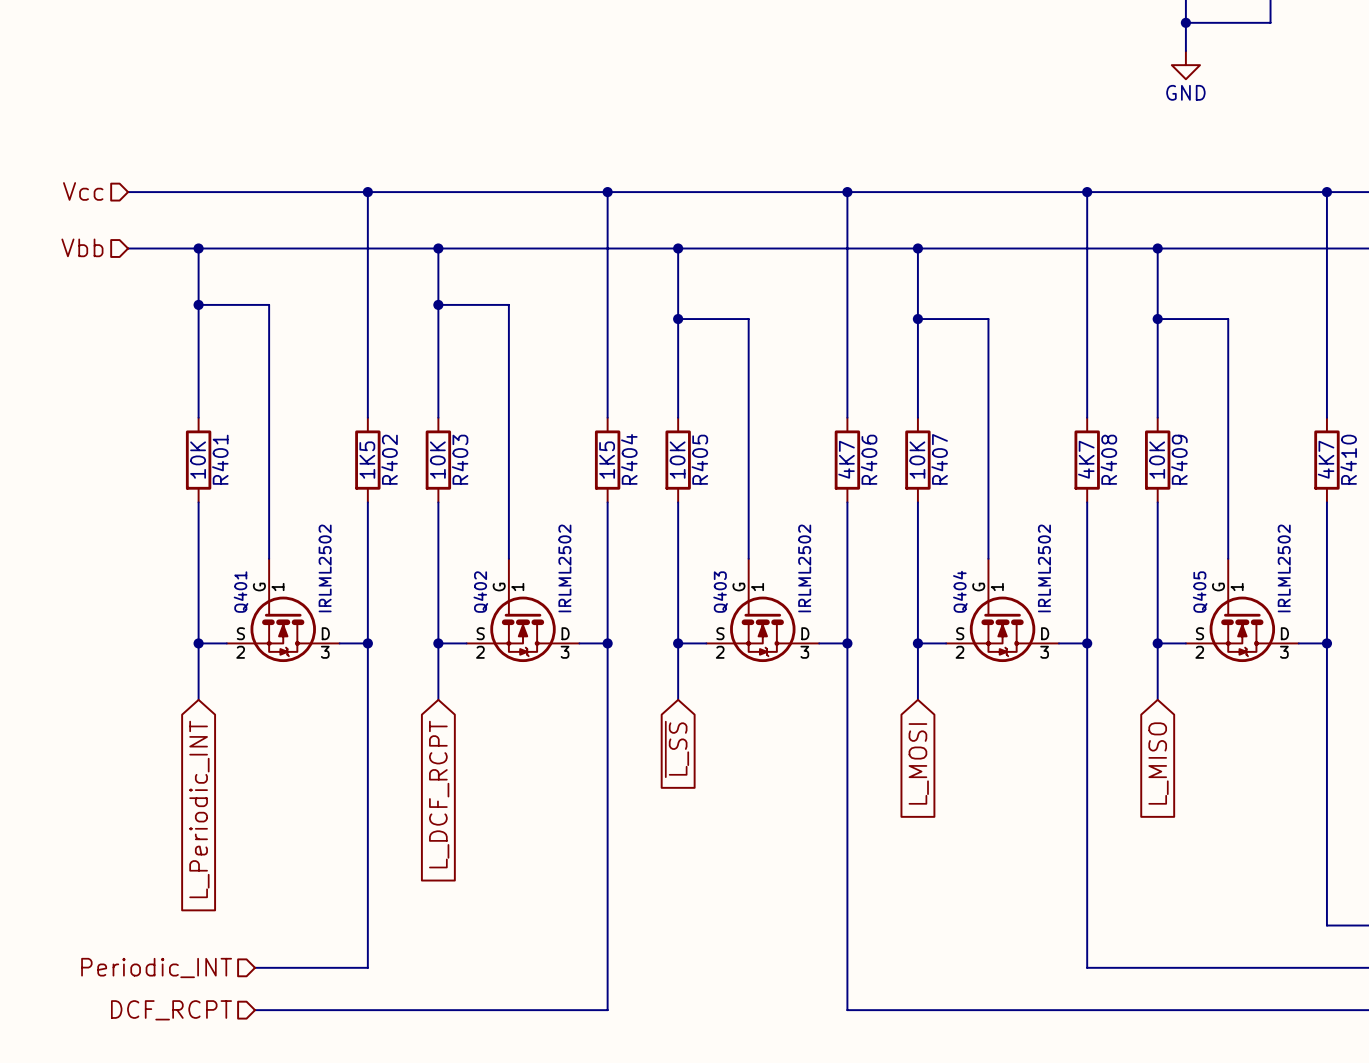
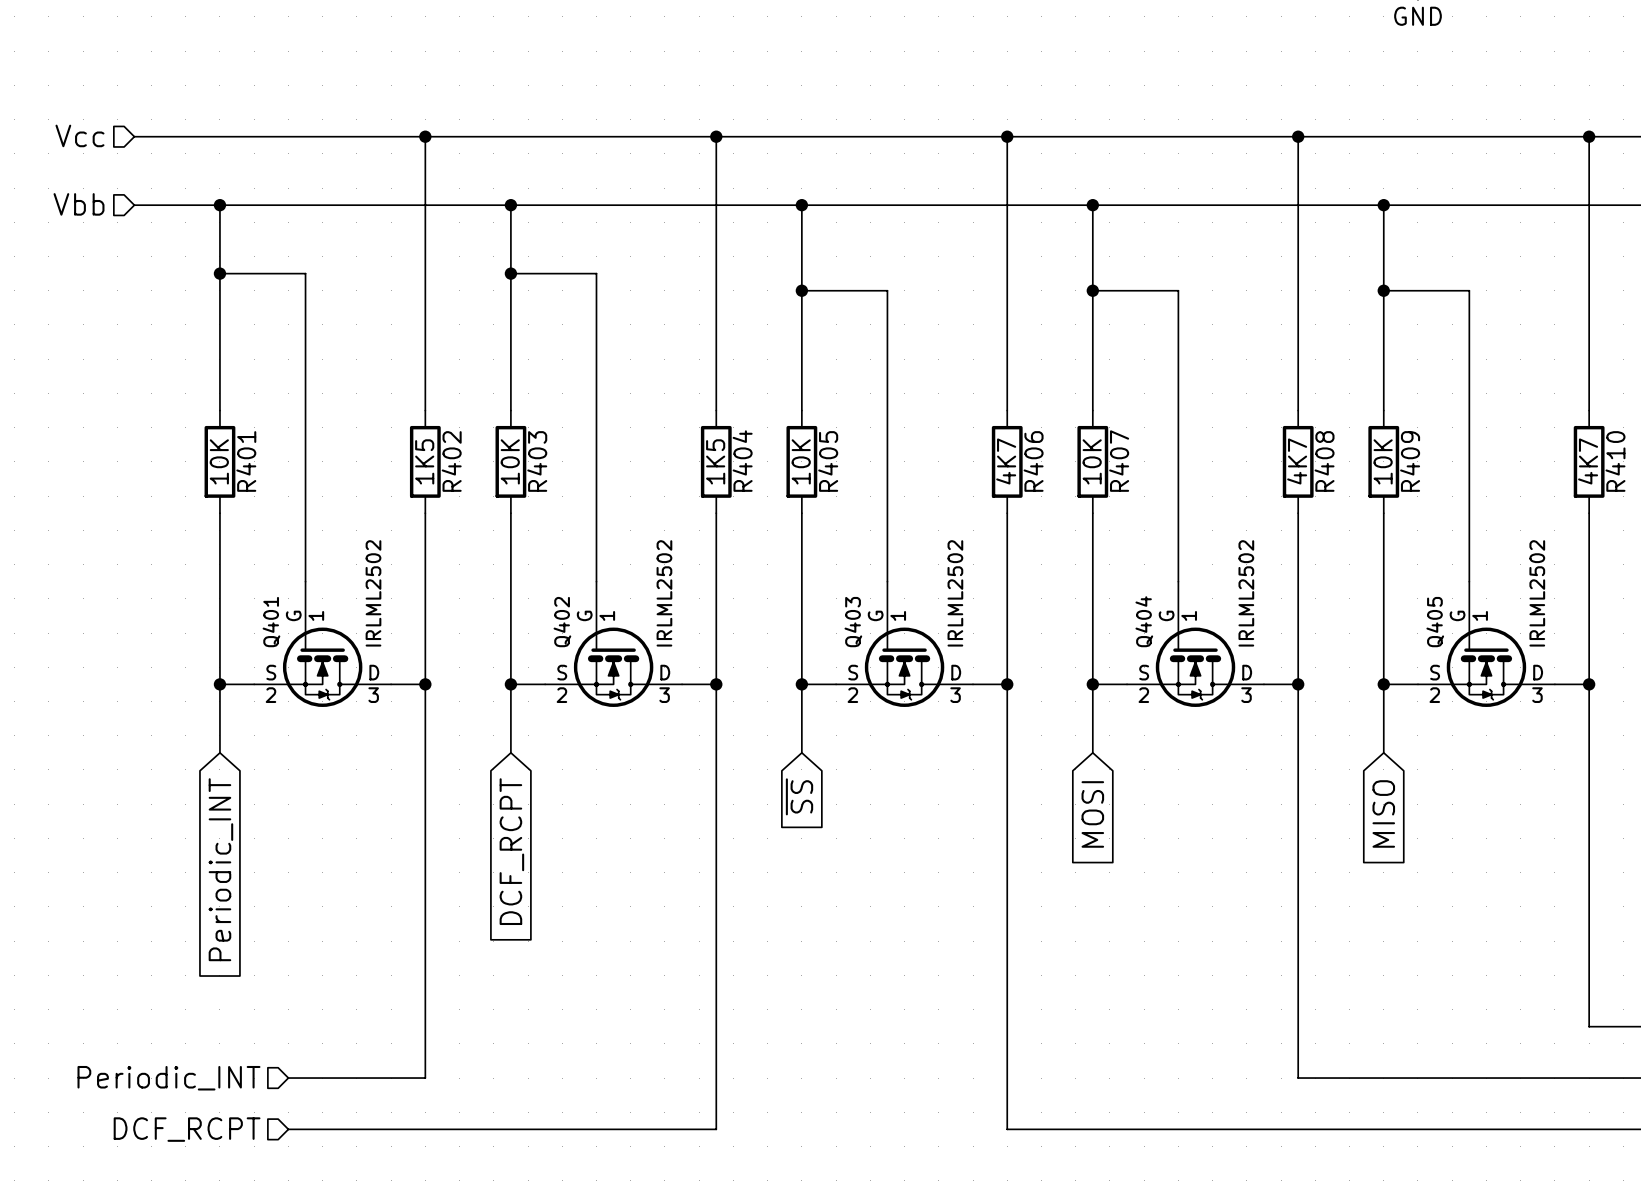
global label: ~{L_SS} (677, 749) -> ~{SS} (799, 796)
global label: L_MOSI (918, 763) -> MOSI (1092, 814)
global label: L_MISO (1158, 763) -> MISO (1383, 813)
global label: L_DCF_RCPT (439, 794) -> DCF_RCPT (511, 851)
global label: L_Periodic_INT (199, 809) -> Periodic_INT (220, 869)

